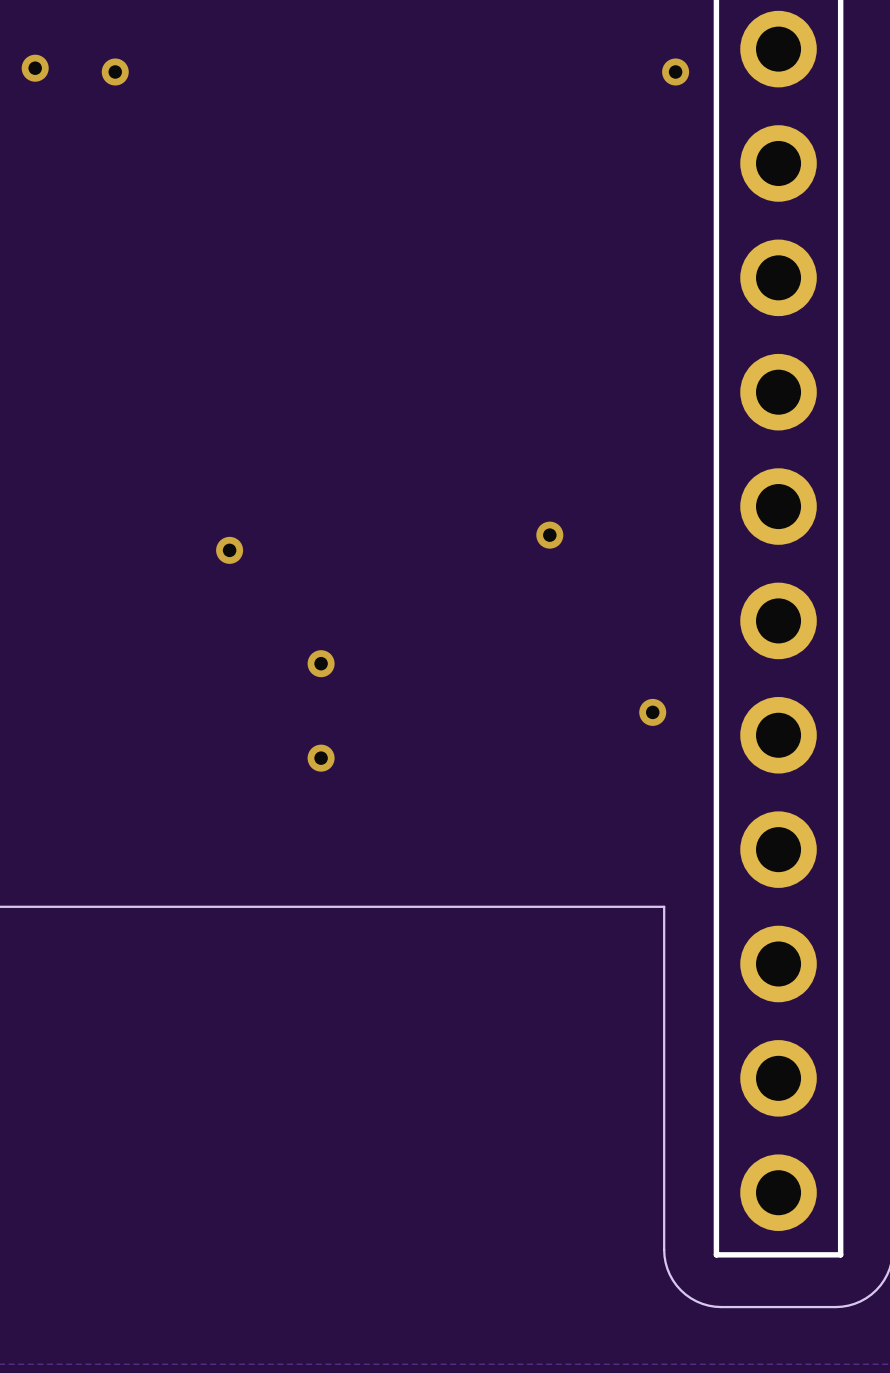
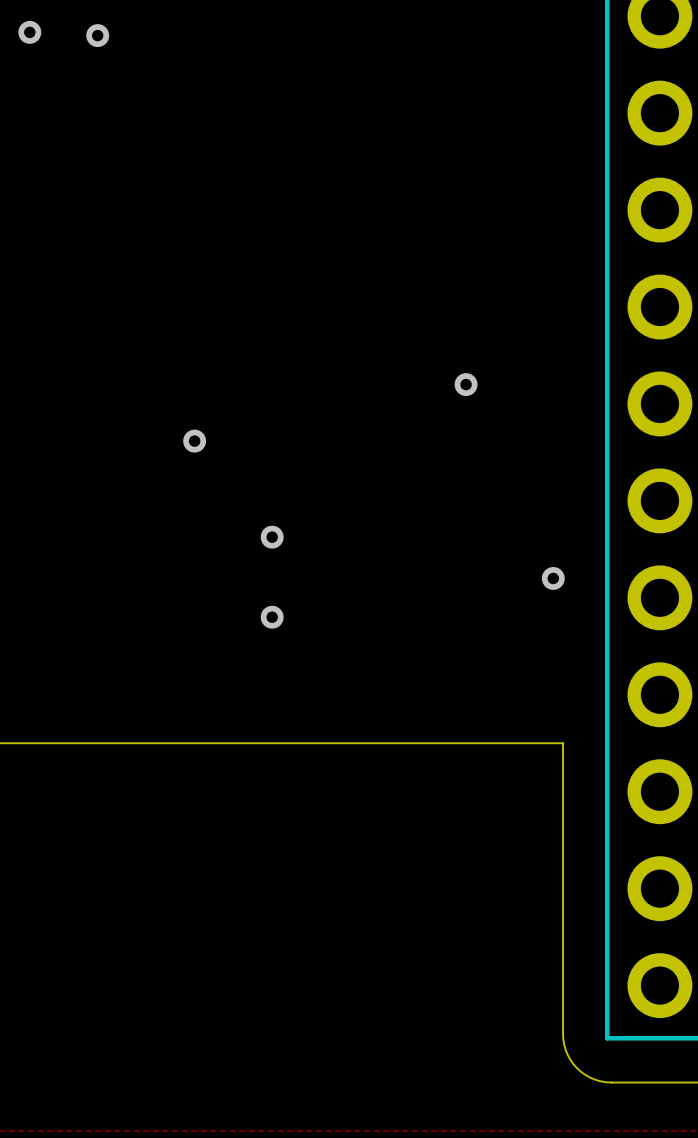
via: (675, 71) -> none
via position: (549, 535) -> (466, 384)

